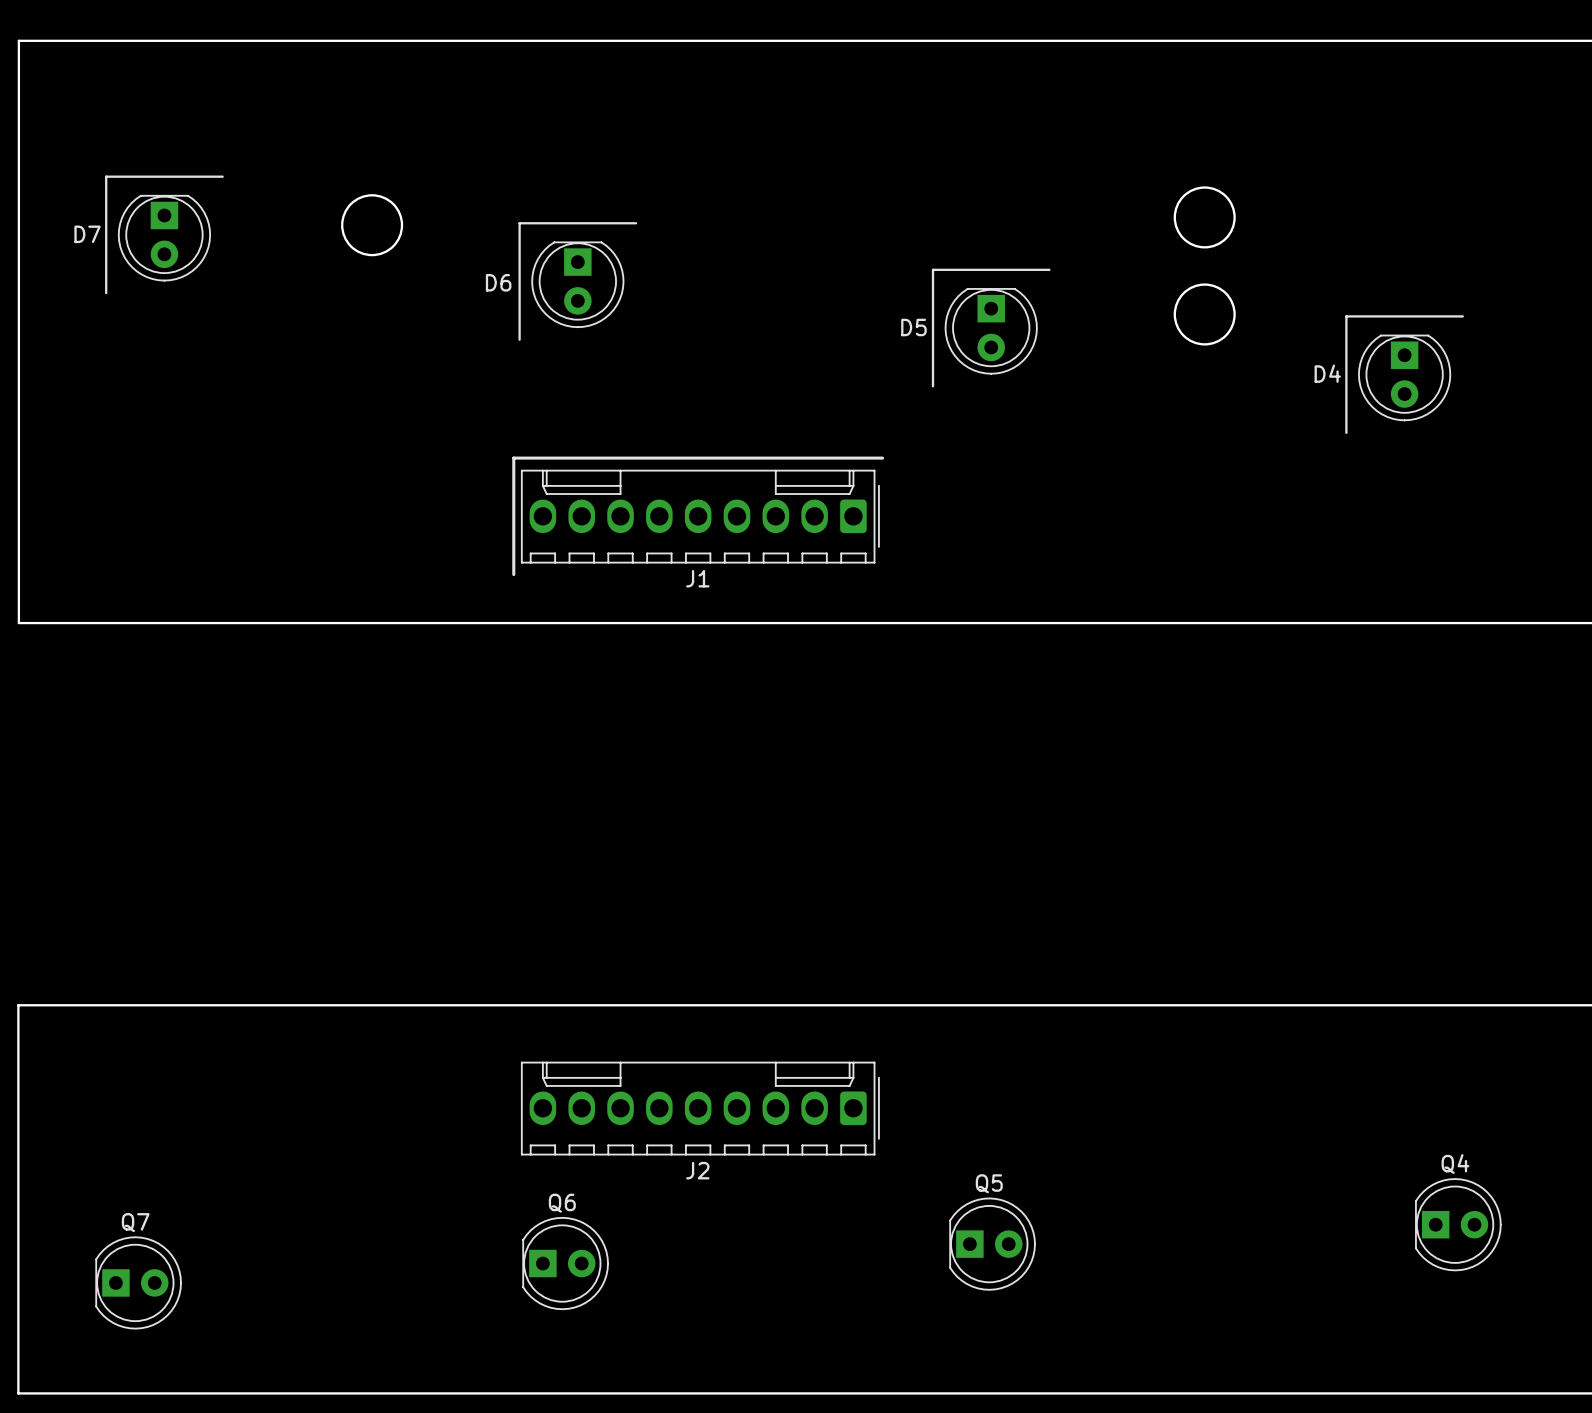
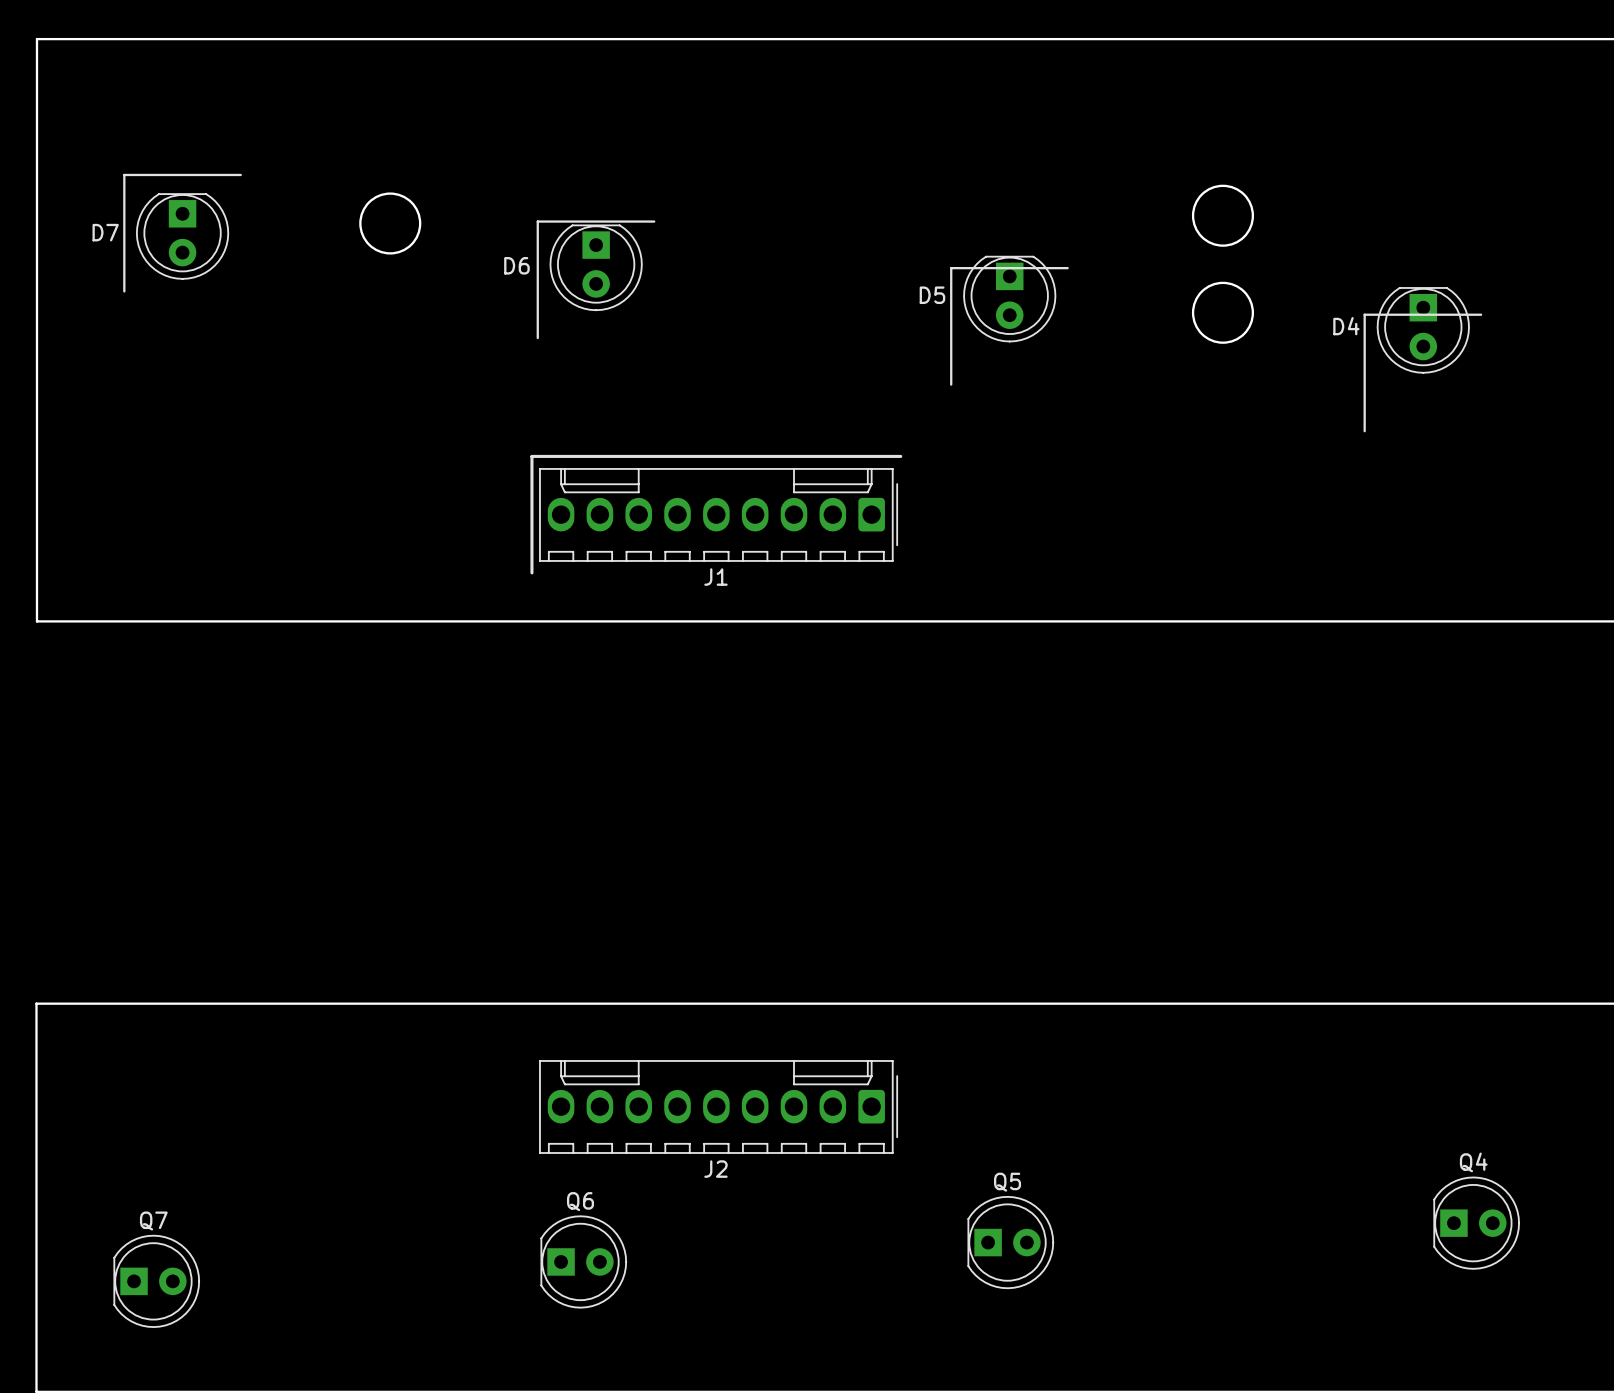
D6 footprint: [531, 241, 625, 329] -> [549, 224, 643, 312]
D5 position: (991, 331) -> (1009, 299)
D4 footprint: [1358, 334, 1452, 422] -> [1376, 287, 1470, 374]

